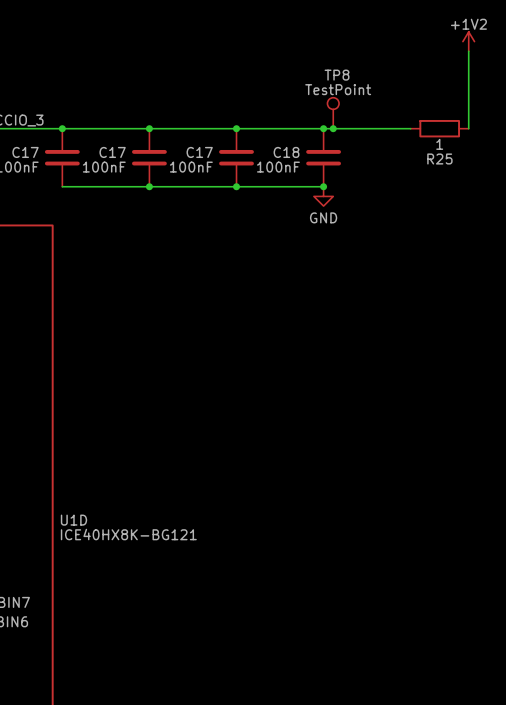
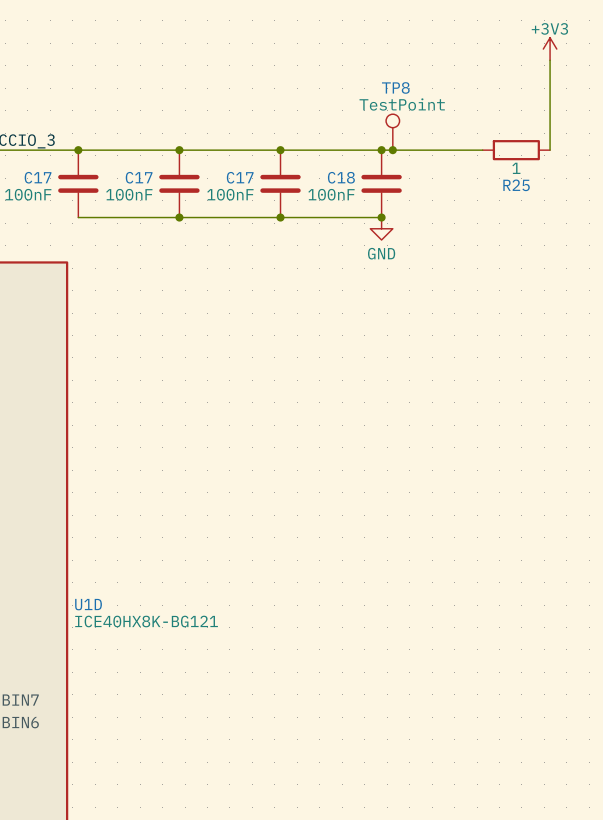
power symbol: +1V2 (468, 41) -> +3V3 (550, 49)

